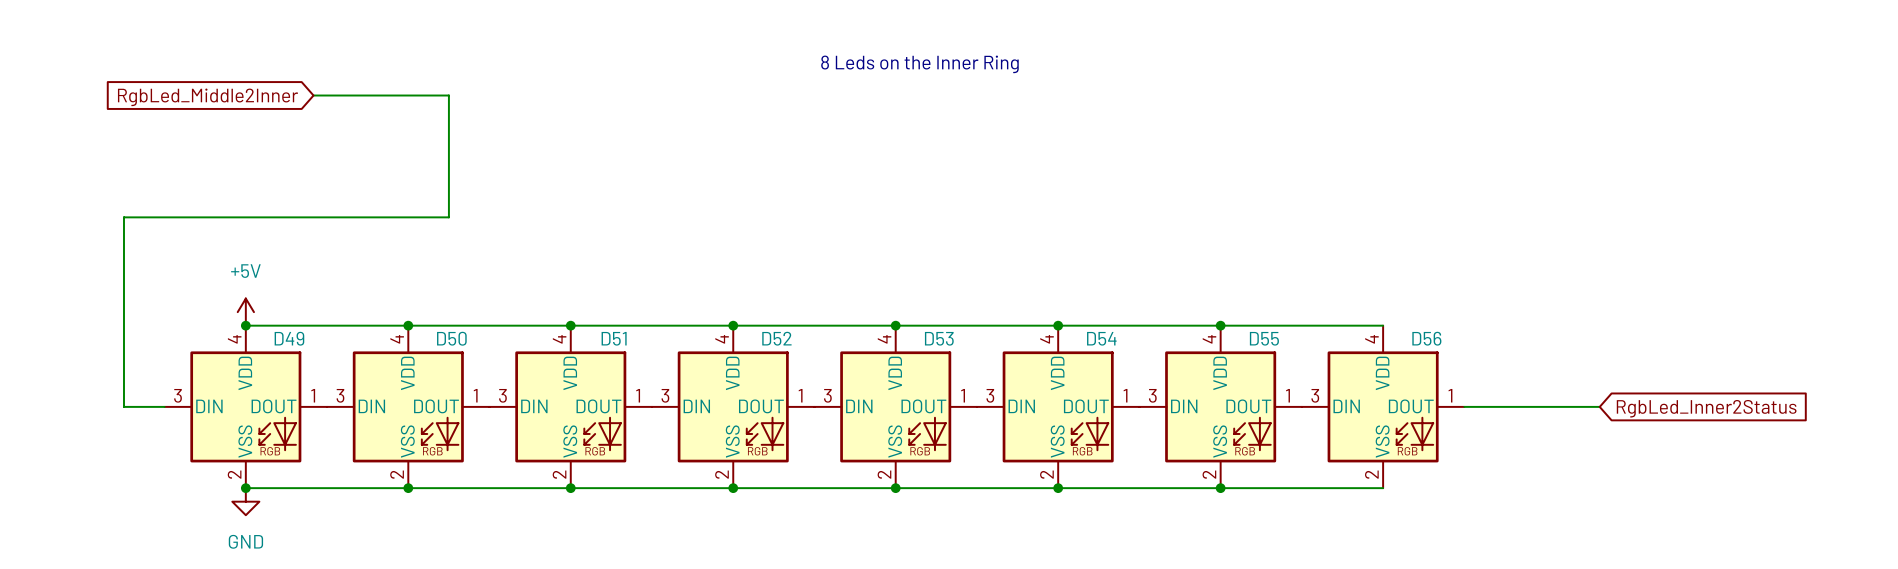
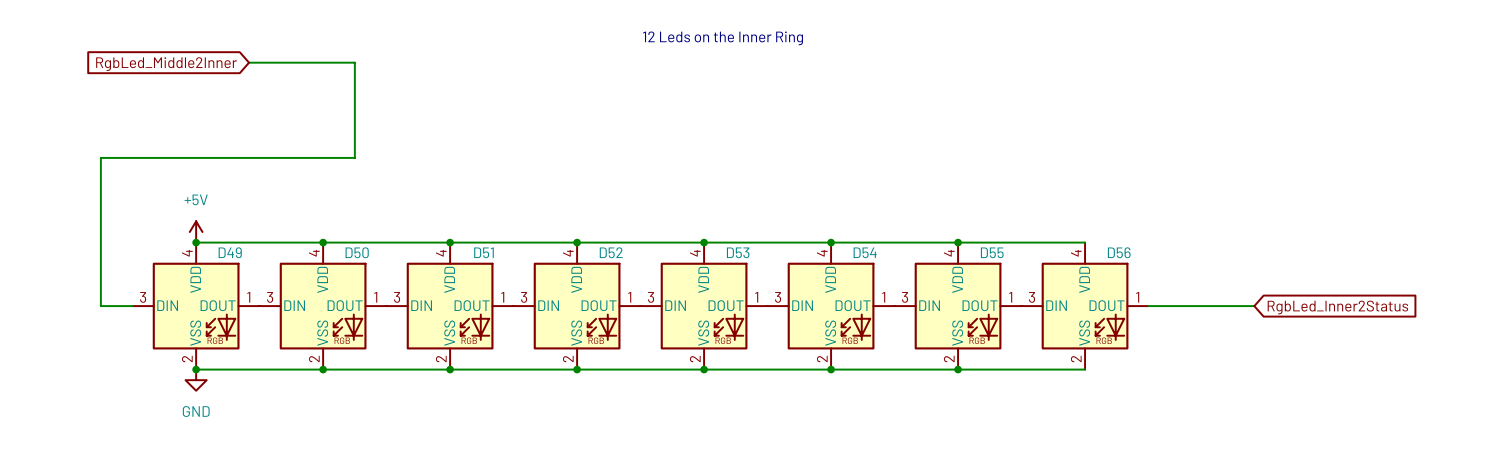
text: 8 Leds on the Inner Ring (919, 64) -> 12 Leds on the Inner Ring (723, 38)

